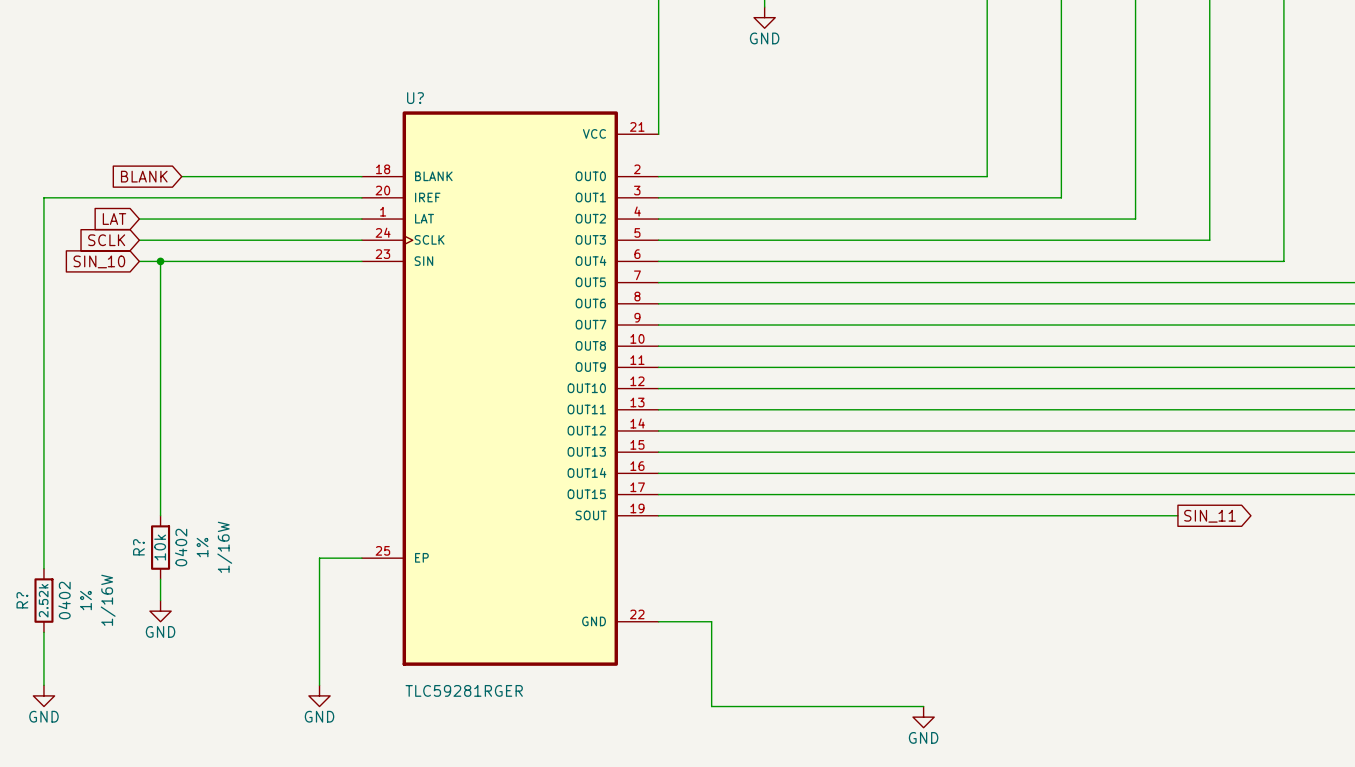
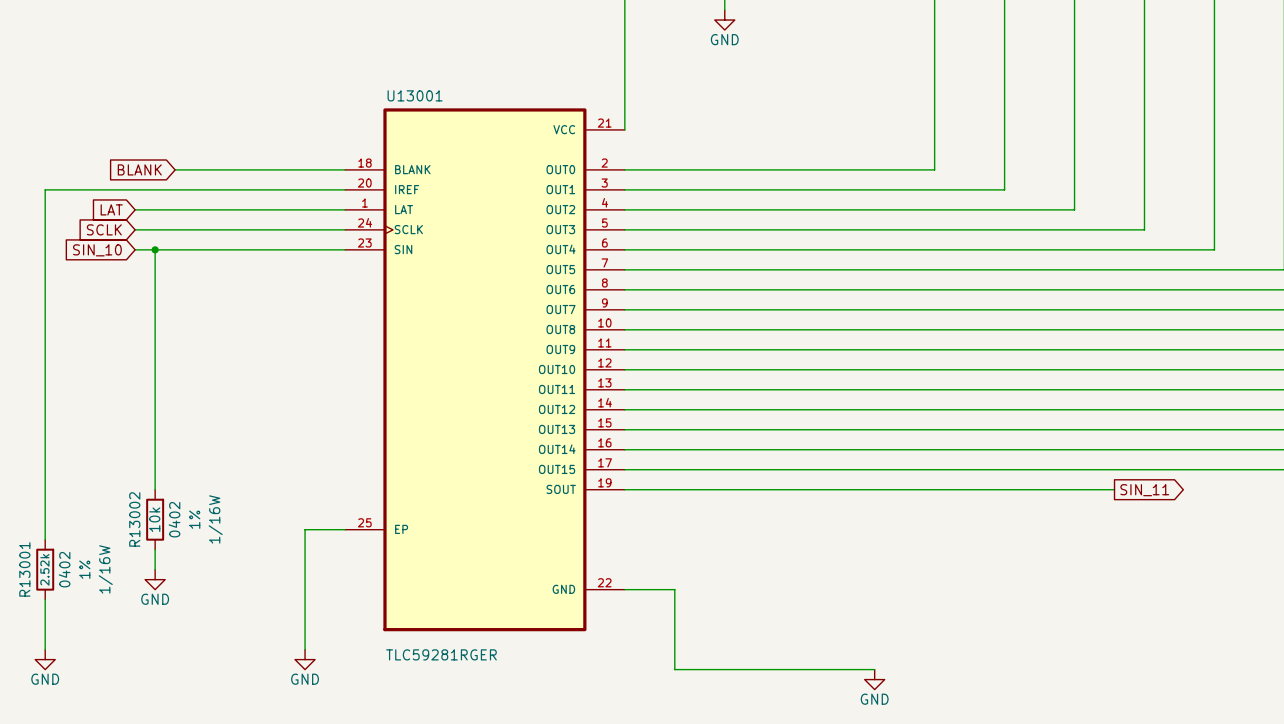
U? name: U? (415, 98) -> U13001 (415, 95)
R? name: R? (138, 547) -> R13002 (134, 519)
R? name: R? (22, 600) -> R13001 (24, 569)

